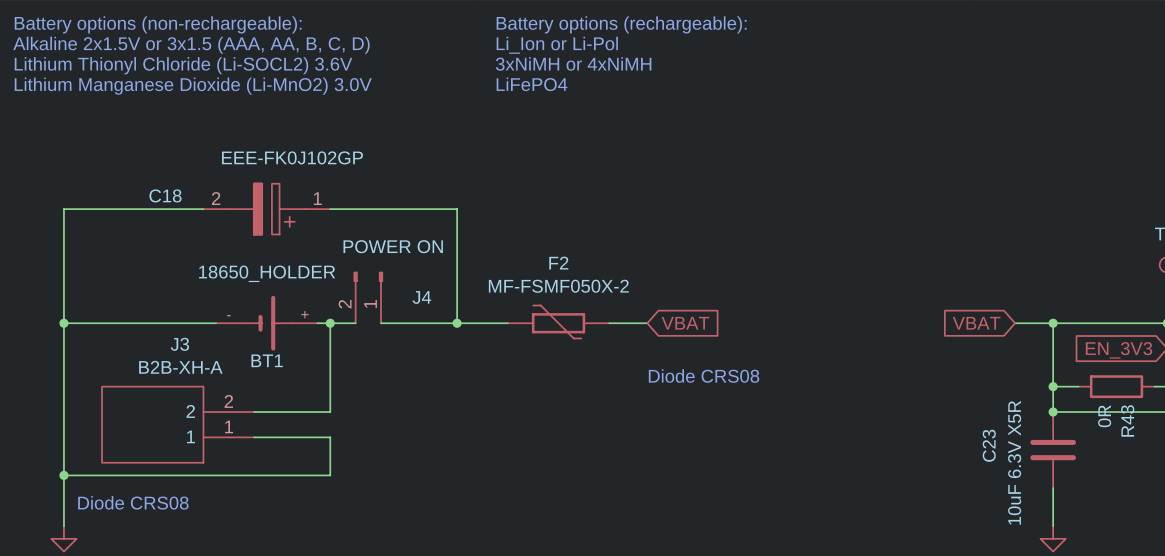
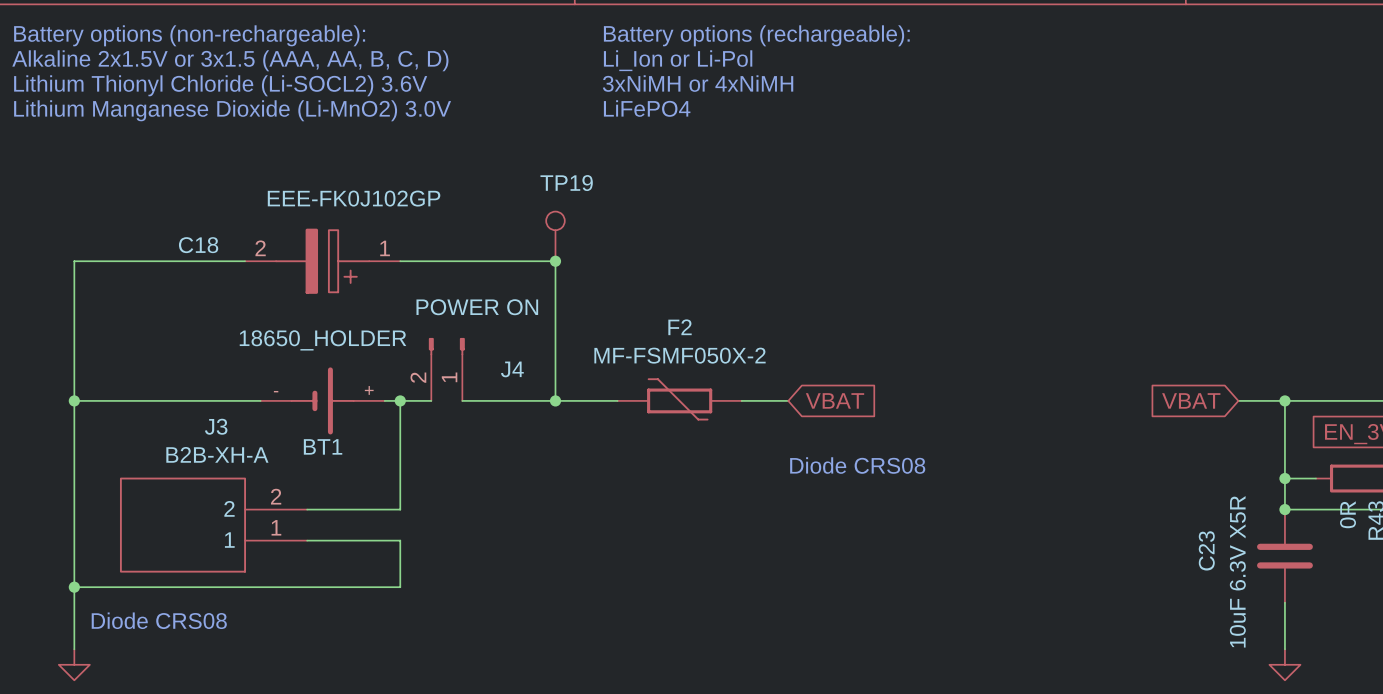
TP19: none -> (555, 236)
junction: none -> (555, 261)

